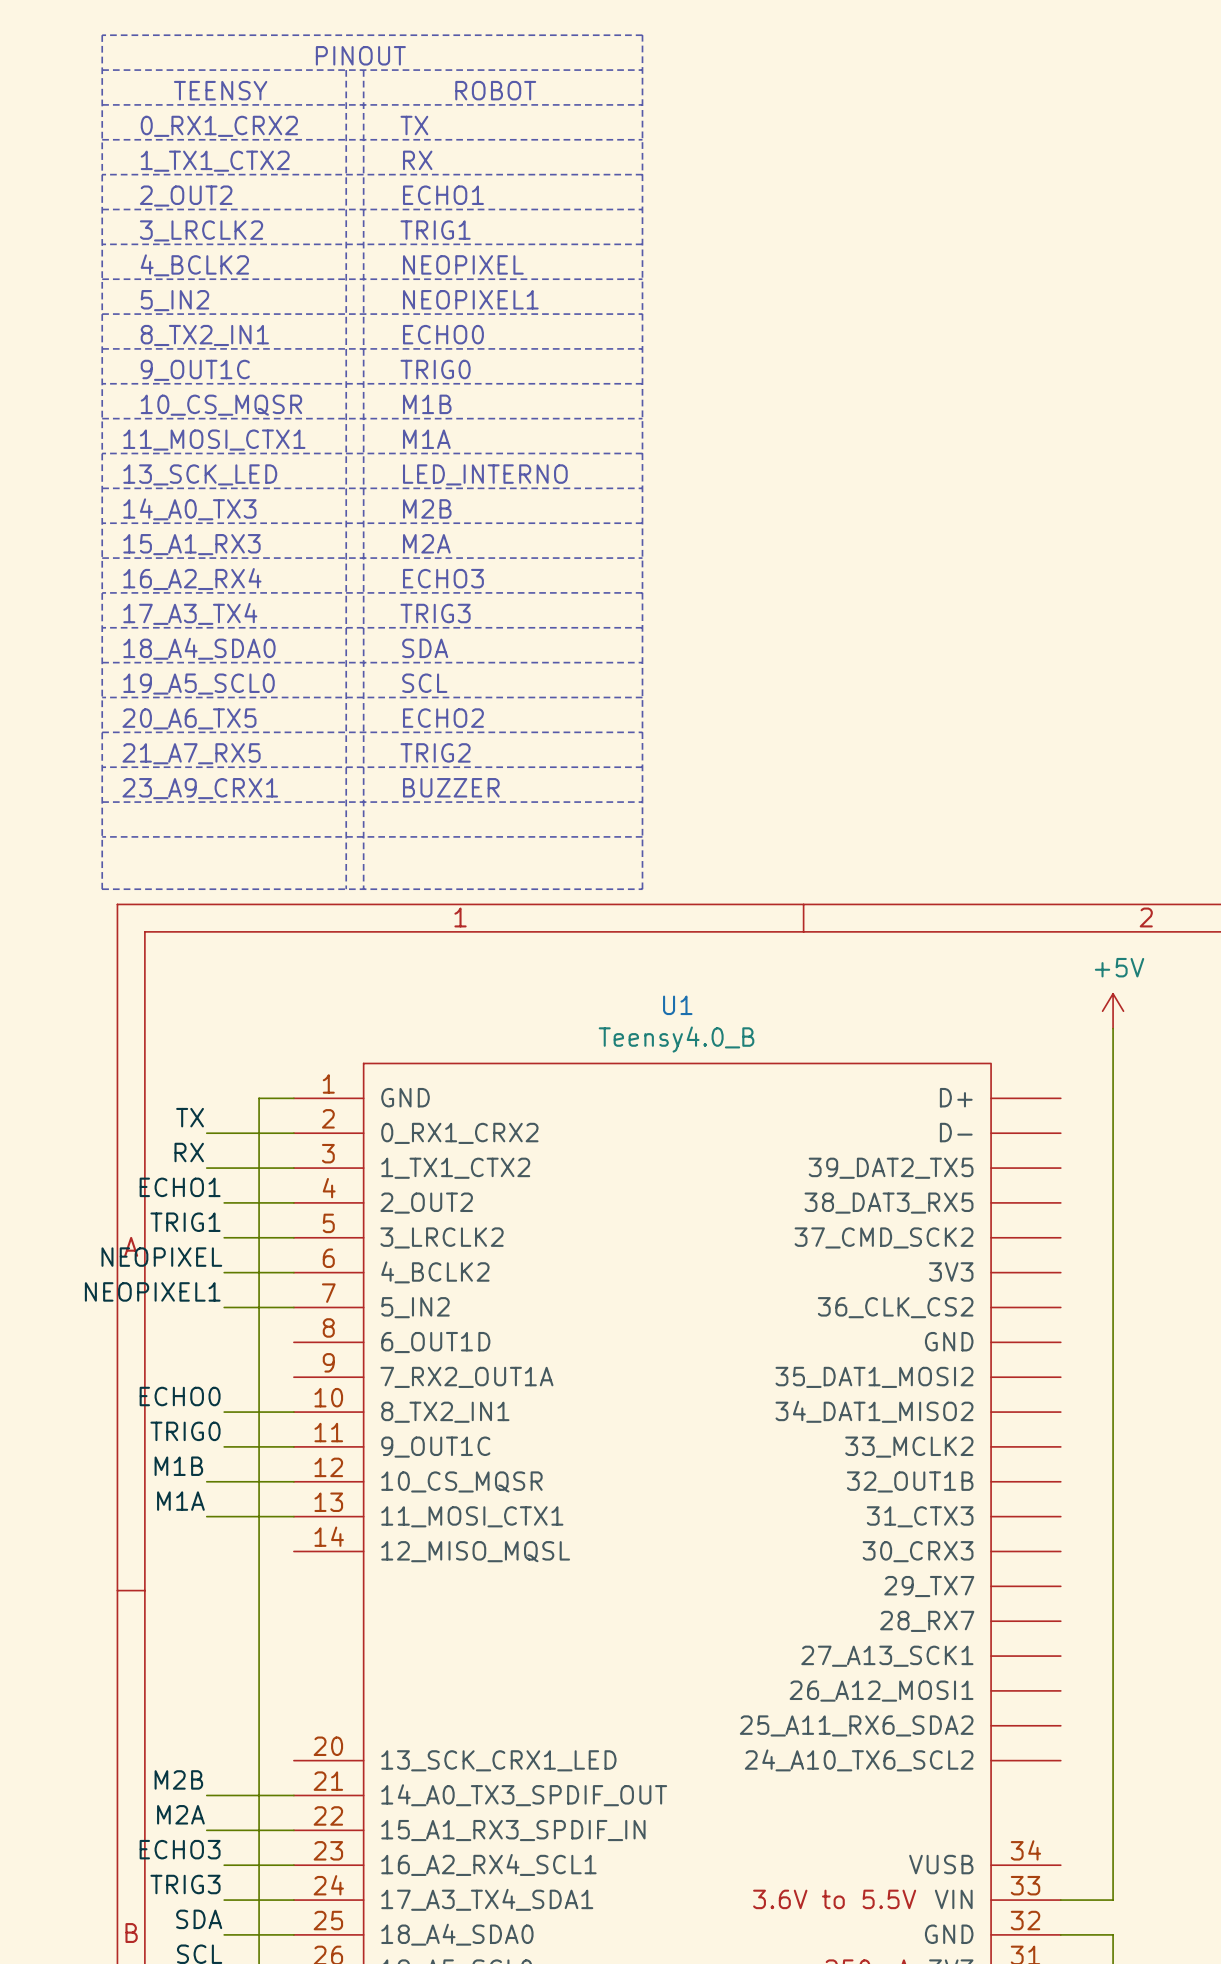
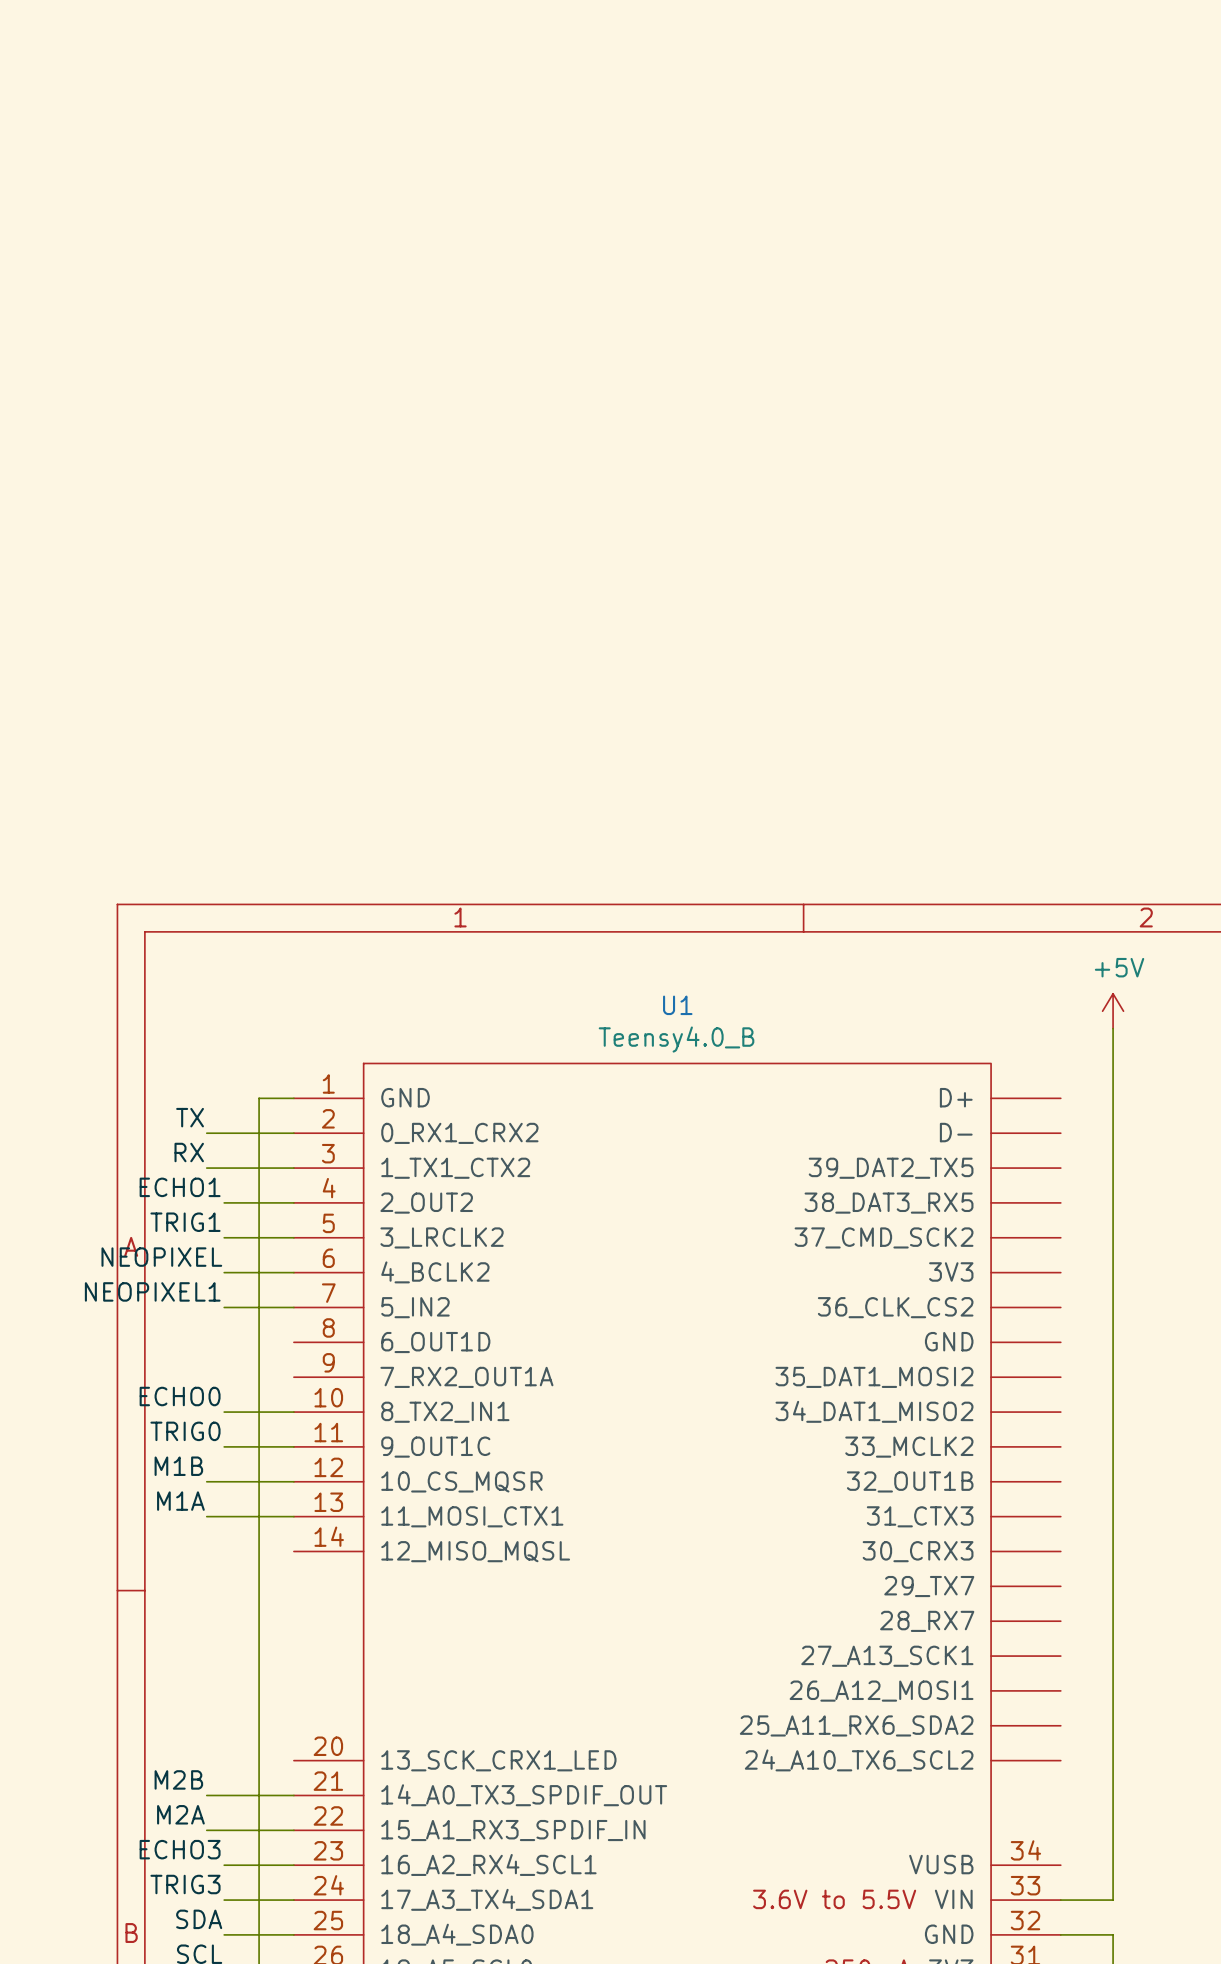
line: (102, 35) (642, 35) (642, 889) (102, 889) (102, 35) -> none
text: PINOUT (360, 55) -> none
line: (102, 70) (642, 70) -> none
line: (346, 70) (346, 889) -> none
line: (363, 70) (363, 889) -> none
text: TEENSY (220, 90) -> none
text: ROBOT (495, 90) -> none
line: (102, 104) (642, 104) -> none
text: TX (414, 125) -> none
text: 0_RX1_CRX2 (219, 126) -> none
line: (102, 139) (642, 139) -> none
text: RX (417, 160) -> none
text: 1_TX1_CTX2 (215, 161) -> none
line: (102, 174) (642, 174) -> none
text: ECHO1 (443, 195) -> none
text: 2_OUT2 (186, 196) -> none
line: (102, 209) (642, 209) -> none
text: 3_LRCLK2 (201, 230) -> none
text: TRIG1 (435, 230) -> none
line: (102, 244) (642, 244) -> none
text: NEOPIXEL (463, 264) -> none
text: 4_BCLK2 (194, 265) -> none
line: (102, 279) (642, 279) -> none
text: NEOPIXEL1 (470, 299) -> none
text: 5_IN2 (174, 300) -> none
line: (102, 314) (642, 314) -> none
text: ECHO0 (443, 334) -> none
text: 8_TX2_IN1 (204, 335) -> none
line: (102, 348) (642, 348) -> none
text: TRIG0 (435, 369) -> none
text: 9_OUT1C (195, 370) -> none
line: (102, 383) (642, 383) -> none
text: M1B (427, 404) -> none
text: 10_CS_MQSR (221, 405) -> none
line: (102, 418) (642, 418) -> none
text: M1A (426, 439) -> none
text: 11_MOSI_CTX1 (214, 440) -> none
line: (102, 453) (642, 453) -> none
text: 13_SCK_LED (200, 474) -> none
text: LED_INTERNO (485, 474) -> none
line: (102, 488) (642, 488) -> none
text: M2B (427, 508) -> none
text: 14_A0_TX3 (189, 509) -> none
line: (102, 523) (642, 523) -> none
text: M2A (426, 543) -> none
text: 15_A1_RX3 (191, 544) -> none
line: (102, 558) (642, 558) -> none
text: ECHO3 (443, 578) -> none
text: 16_A2_RX4 (192, 579) -> none
line: (102, 592) (642, 592) -> none
text: 17_A3_TX4 (190, 613) -> none
text: TRIG3 (435, 613) -> none
line: (102, 627) (642, 627) -> none
text: 18_A4_SDA0 (199, 648) -> none
text: SDA (425, 648) -> none
line: (102, 662) (642, 662) -> none
text: SCL (424, 683) -> none
text: 19_A5_SCL0 (199, 684) -> none
line: (102, 697) (642, 697) -> none
text: 20_A6_TX5 (189, 718) -> none
text: ECHO2 (443, 718) -> none
line: (102, 732) (642, 732) -> none
text: TRIG2 (435, 752) -> none
text: 21_A7_RX5 (191, 753) -> none
line: (102, 767) (642, 767) -> none
text: BUZZER (451, 787) -> none
text: 23_A9_CRX1 (200, 788) -> none
line: (102, 802) (642, 802) -> none
line: (102, 836) (642, 836) -> none

